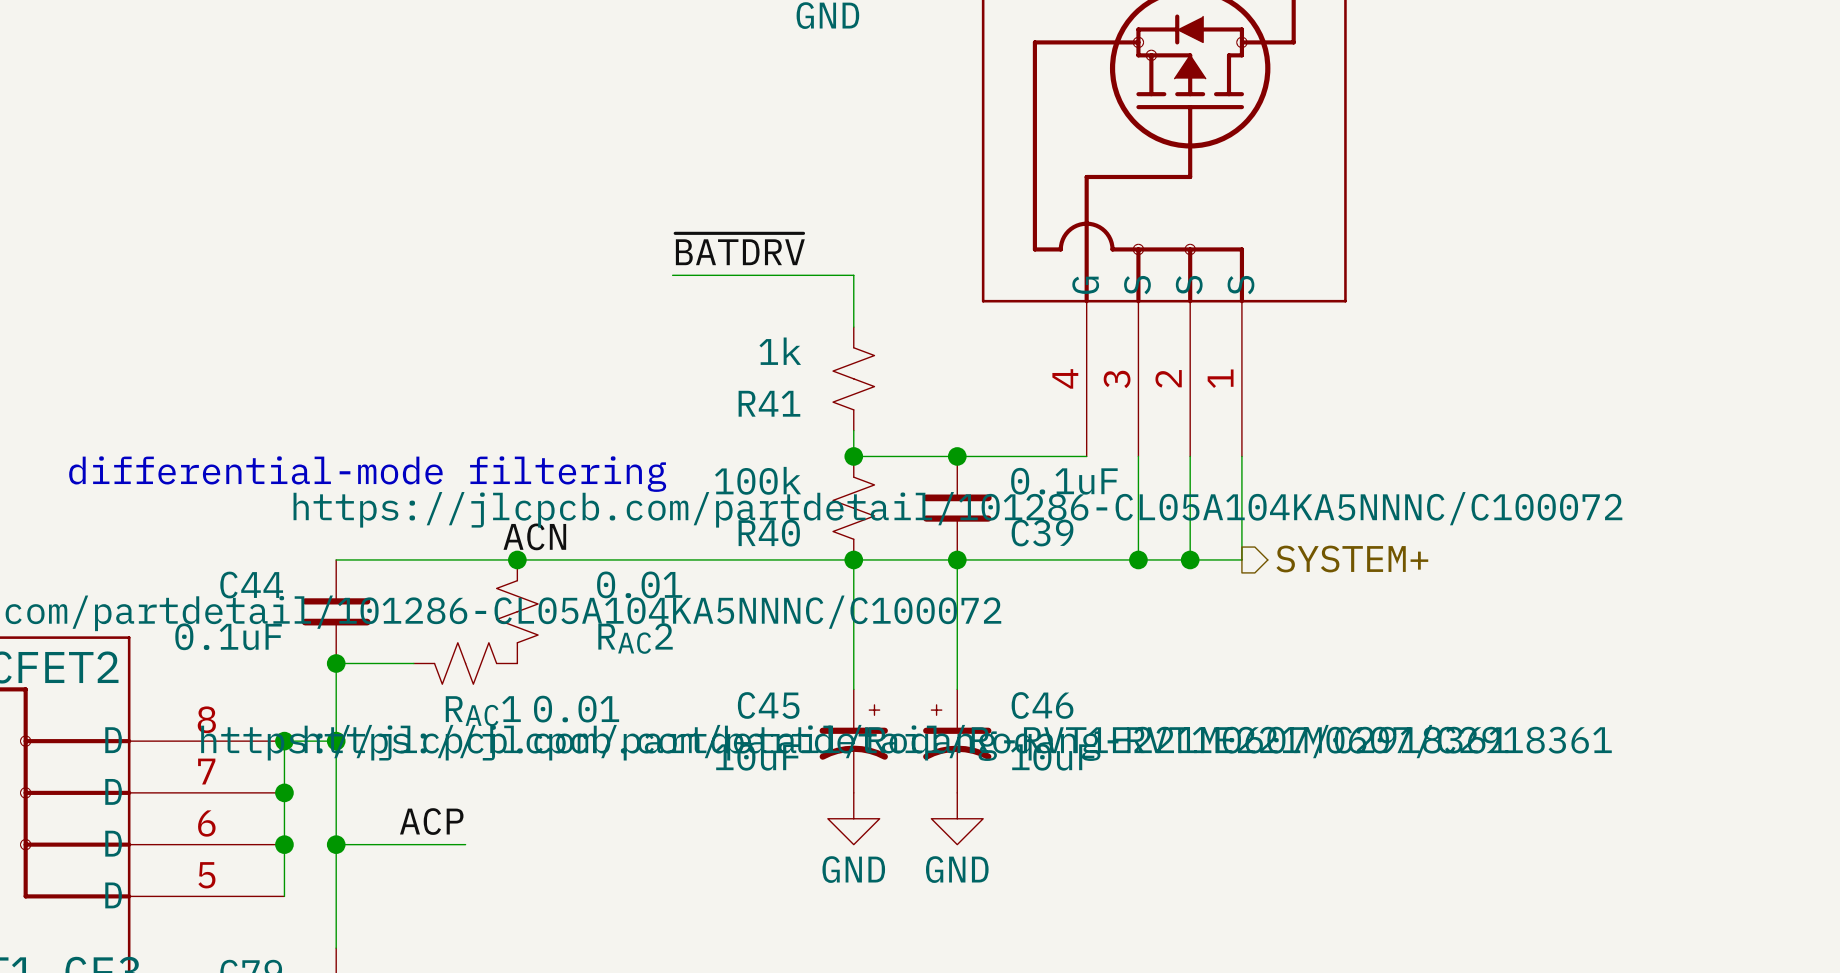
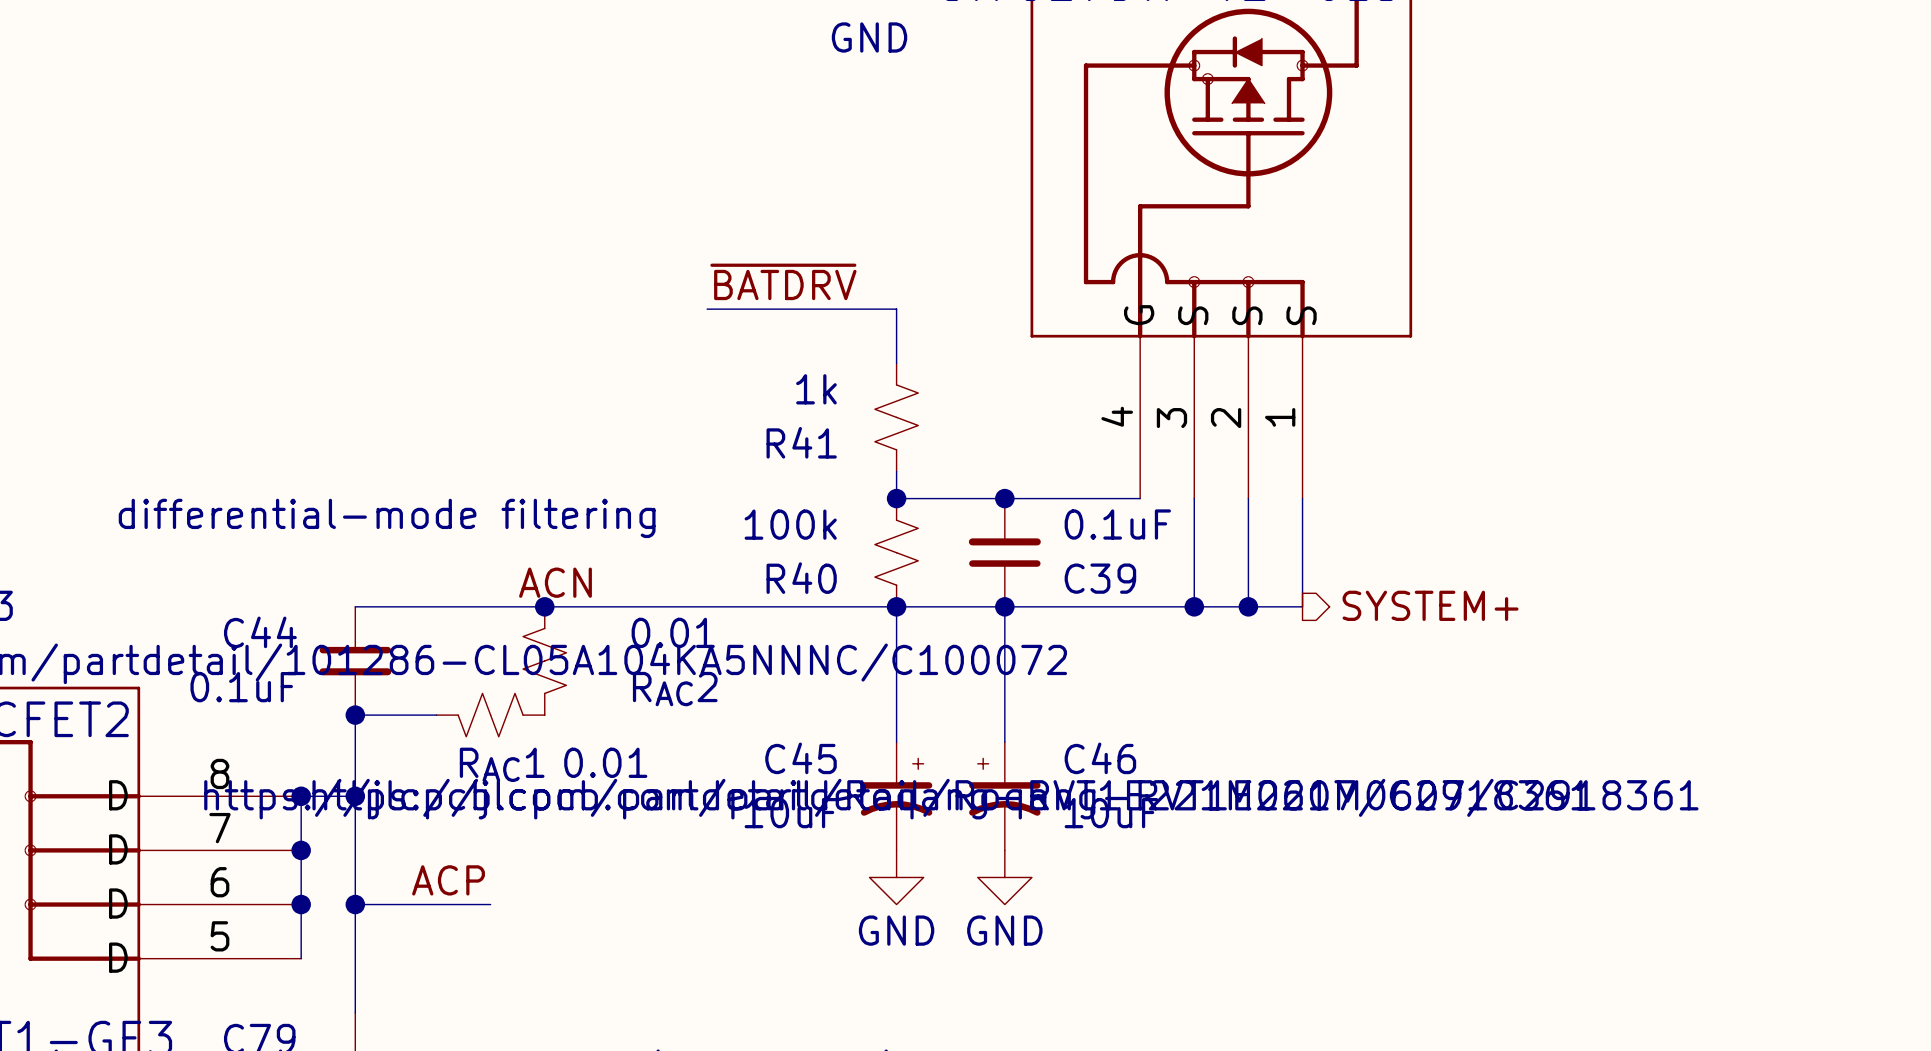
C39 text: https://jlcpcb.com/partdetail/101286-CL05A104KA5NNNC/C100072 (957, 509) -> none

